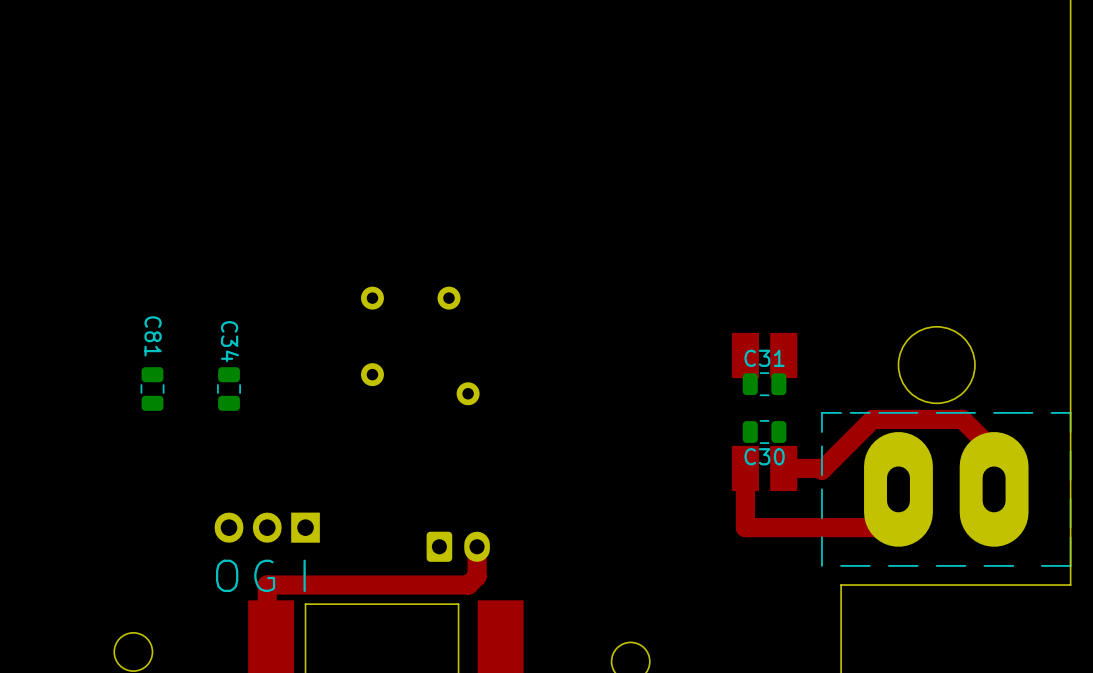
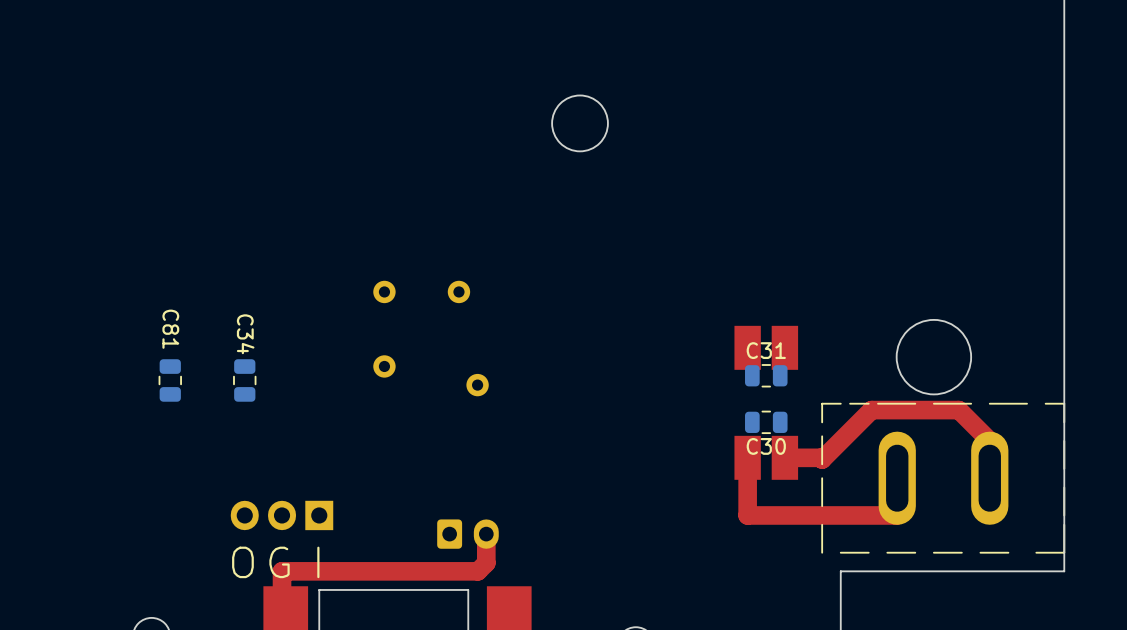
round board edge: none -> [551, 94, 609, 153]
part footprint: [821, 411, 1072, 567] -> [821, 402, 1066, 554]

